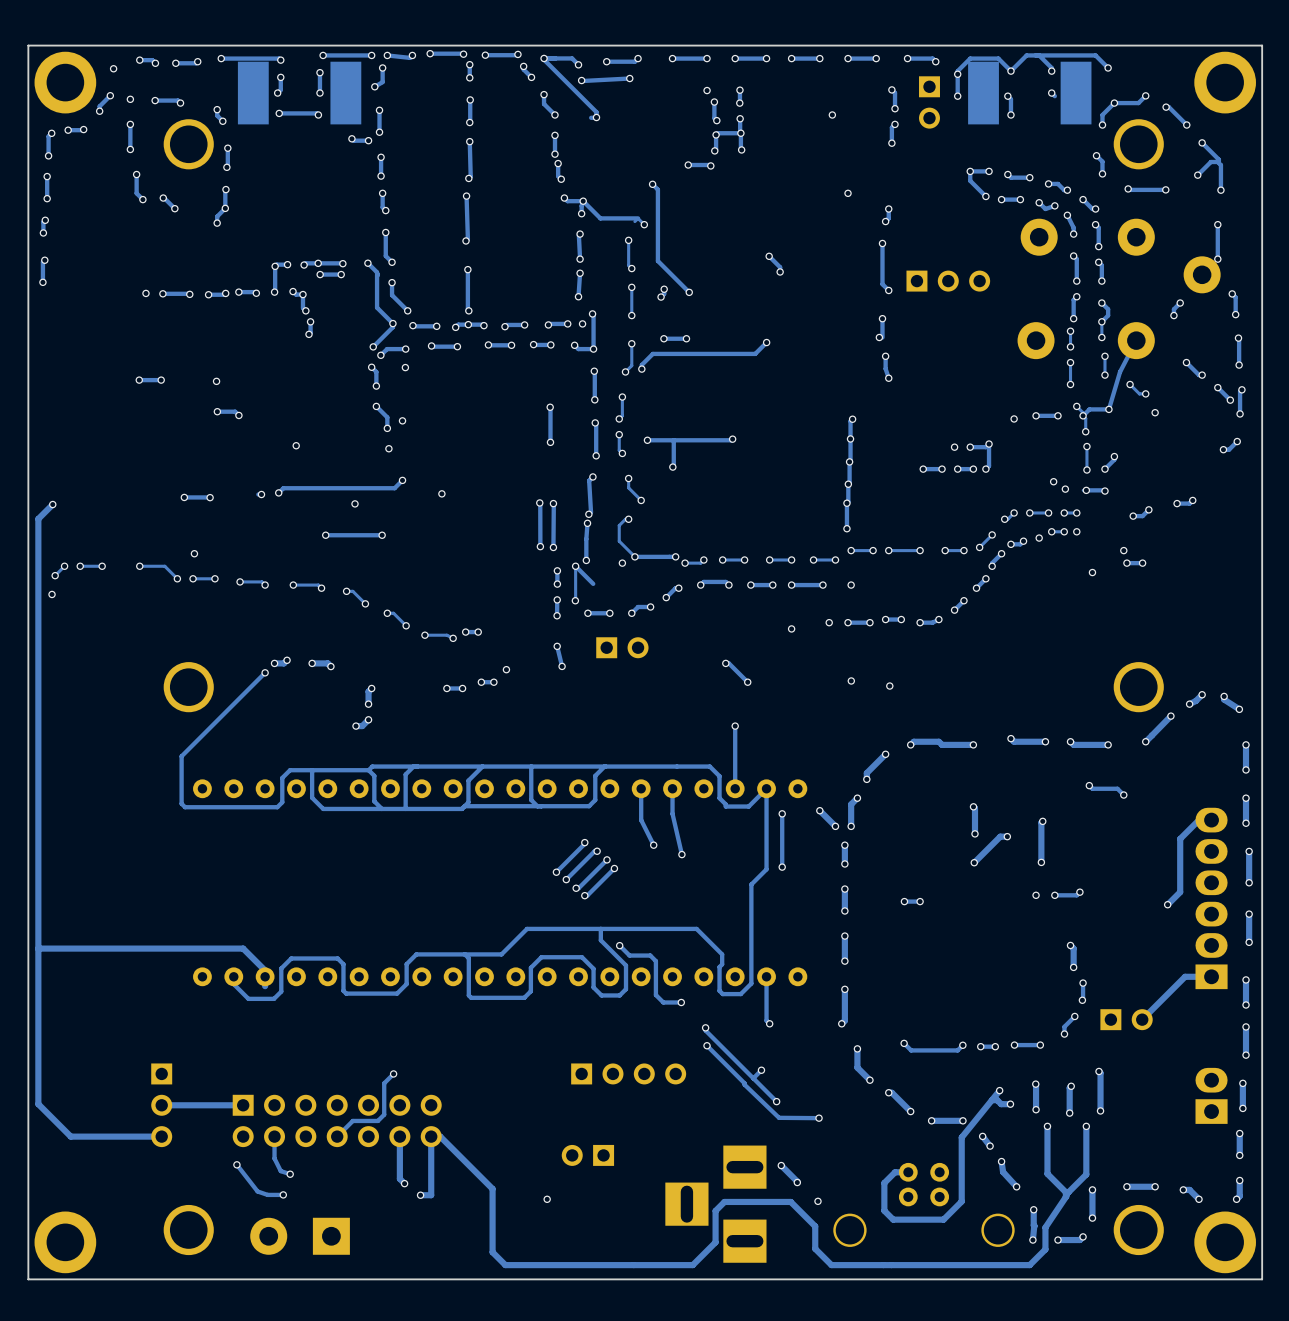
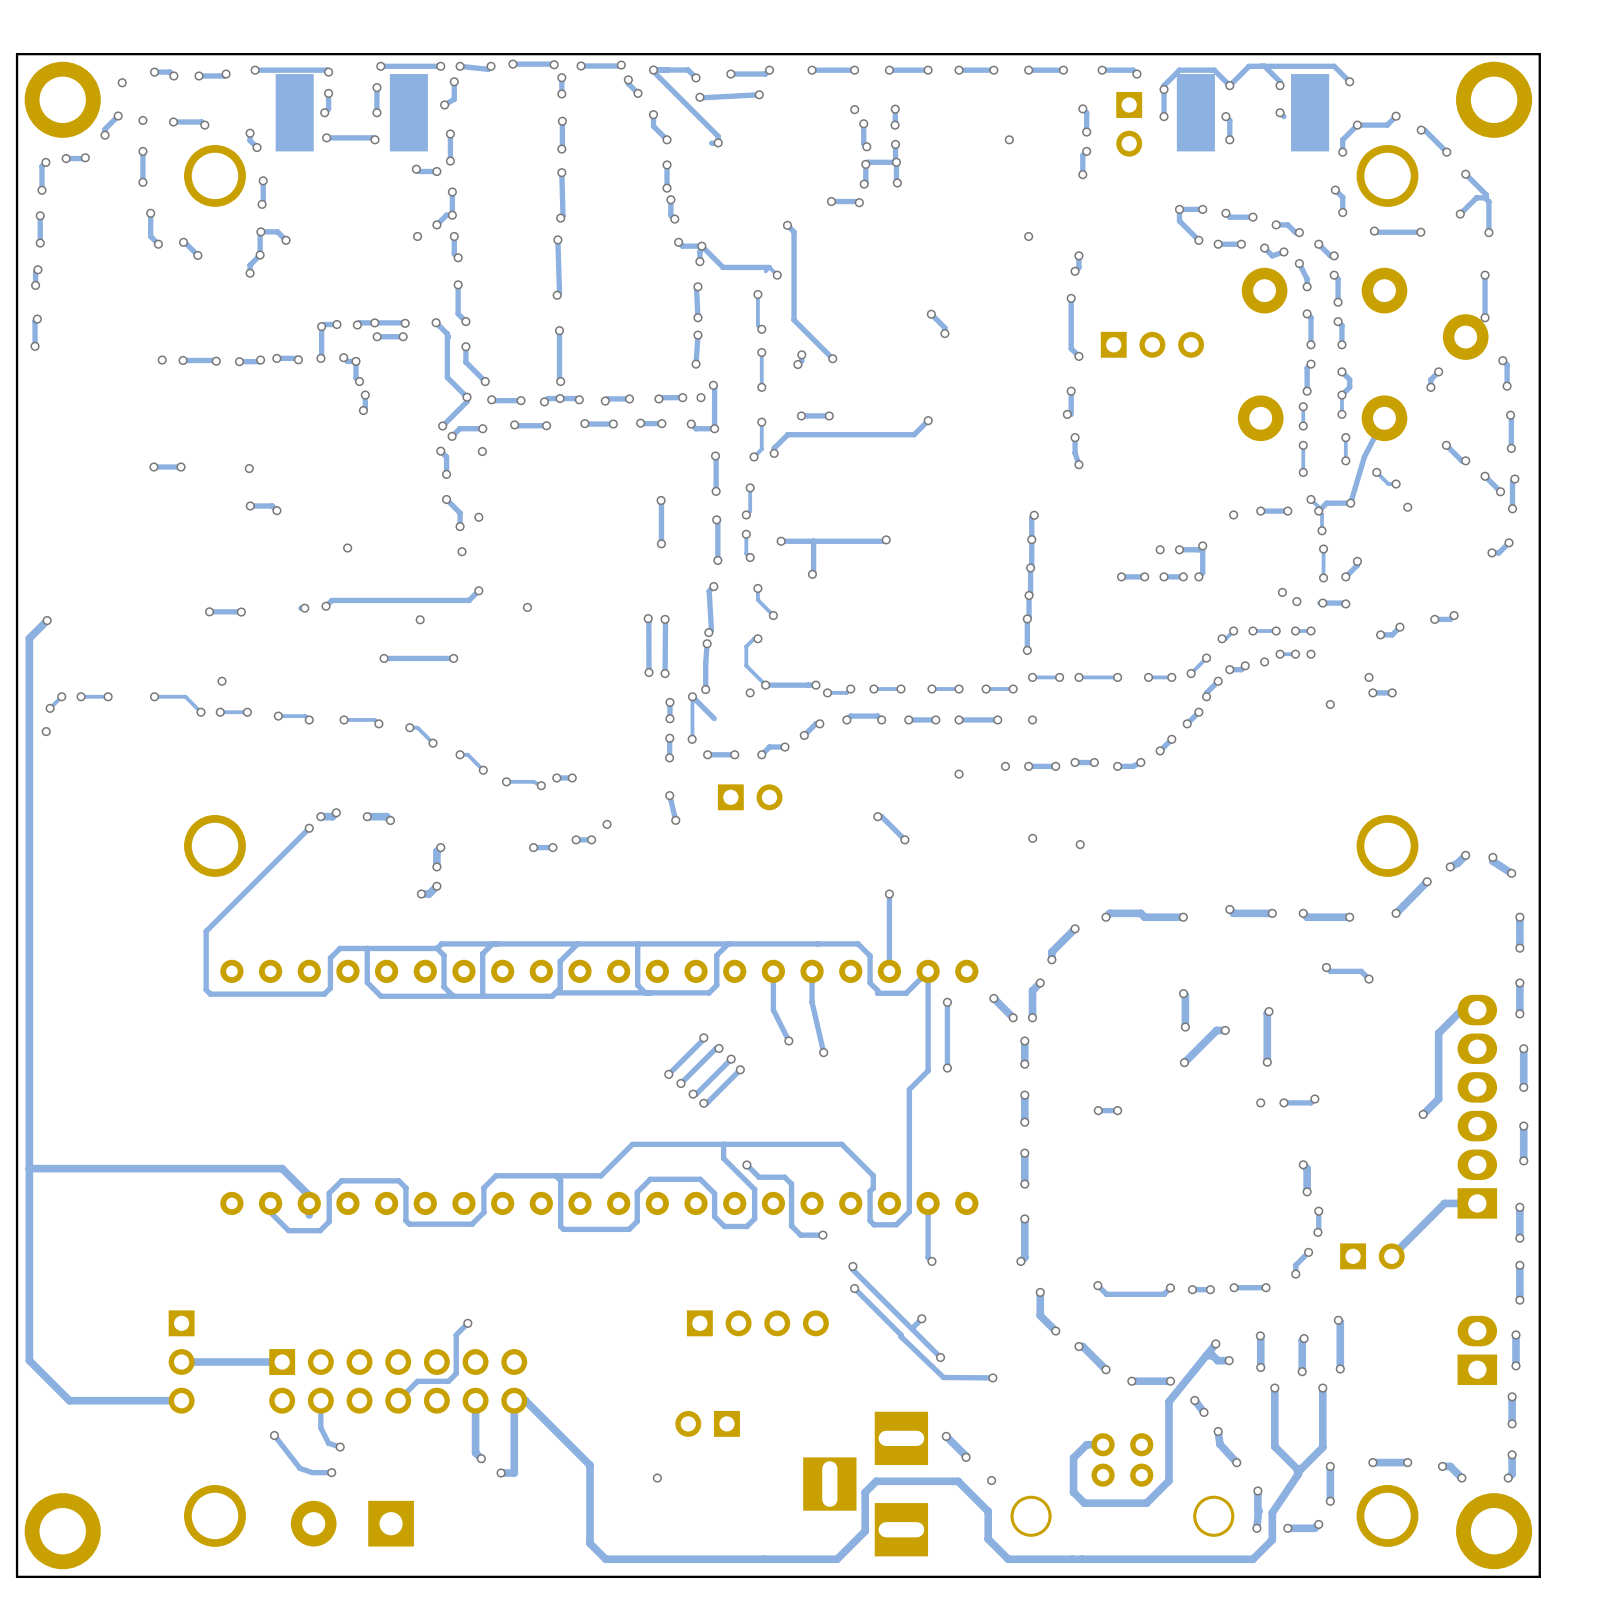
track: none -> (452, 215) (446, 215) (436, 224)
via: none -> (436, 224)
track: none -> (260, 231) (277, 231) (286, 240)
via: none -> (417, 236)
via: none -> (286, 240)

